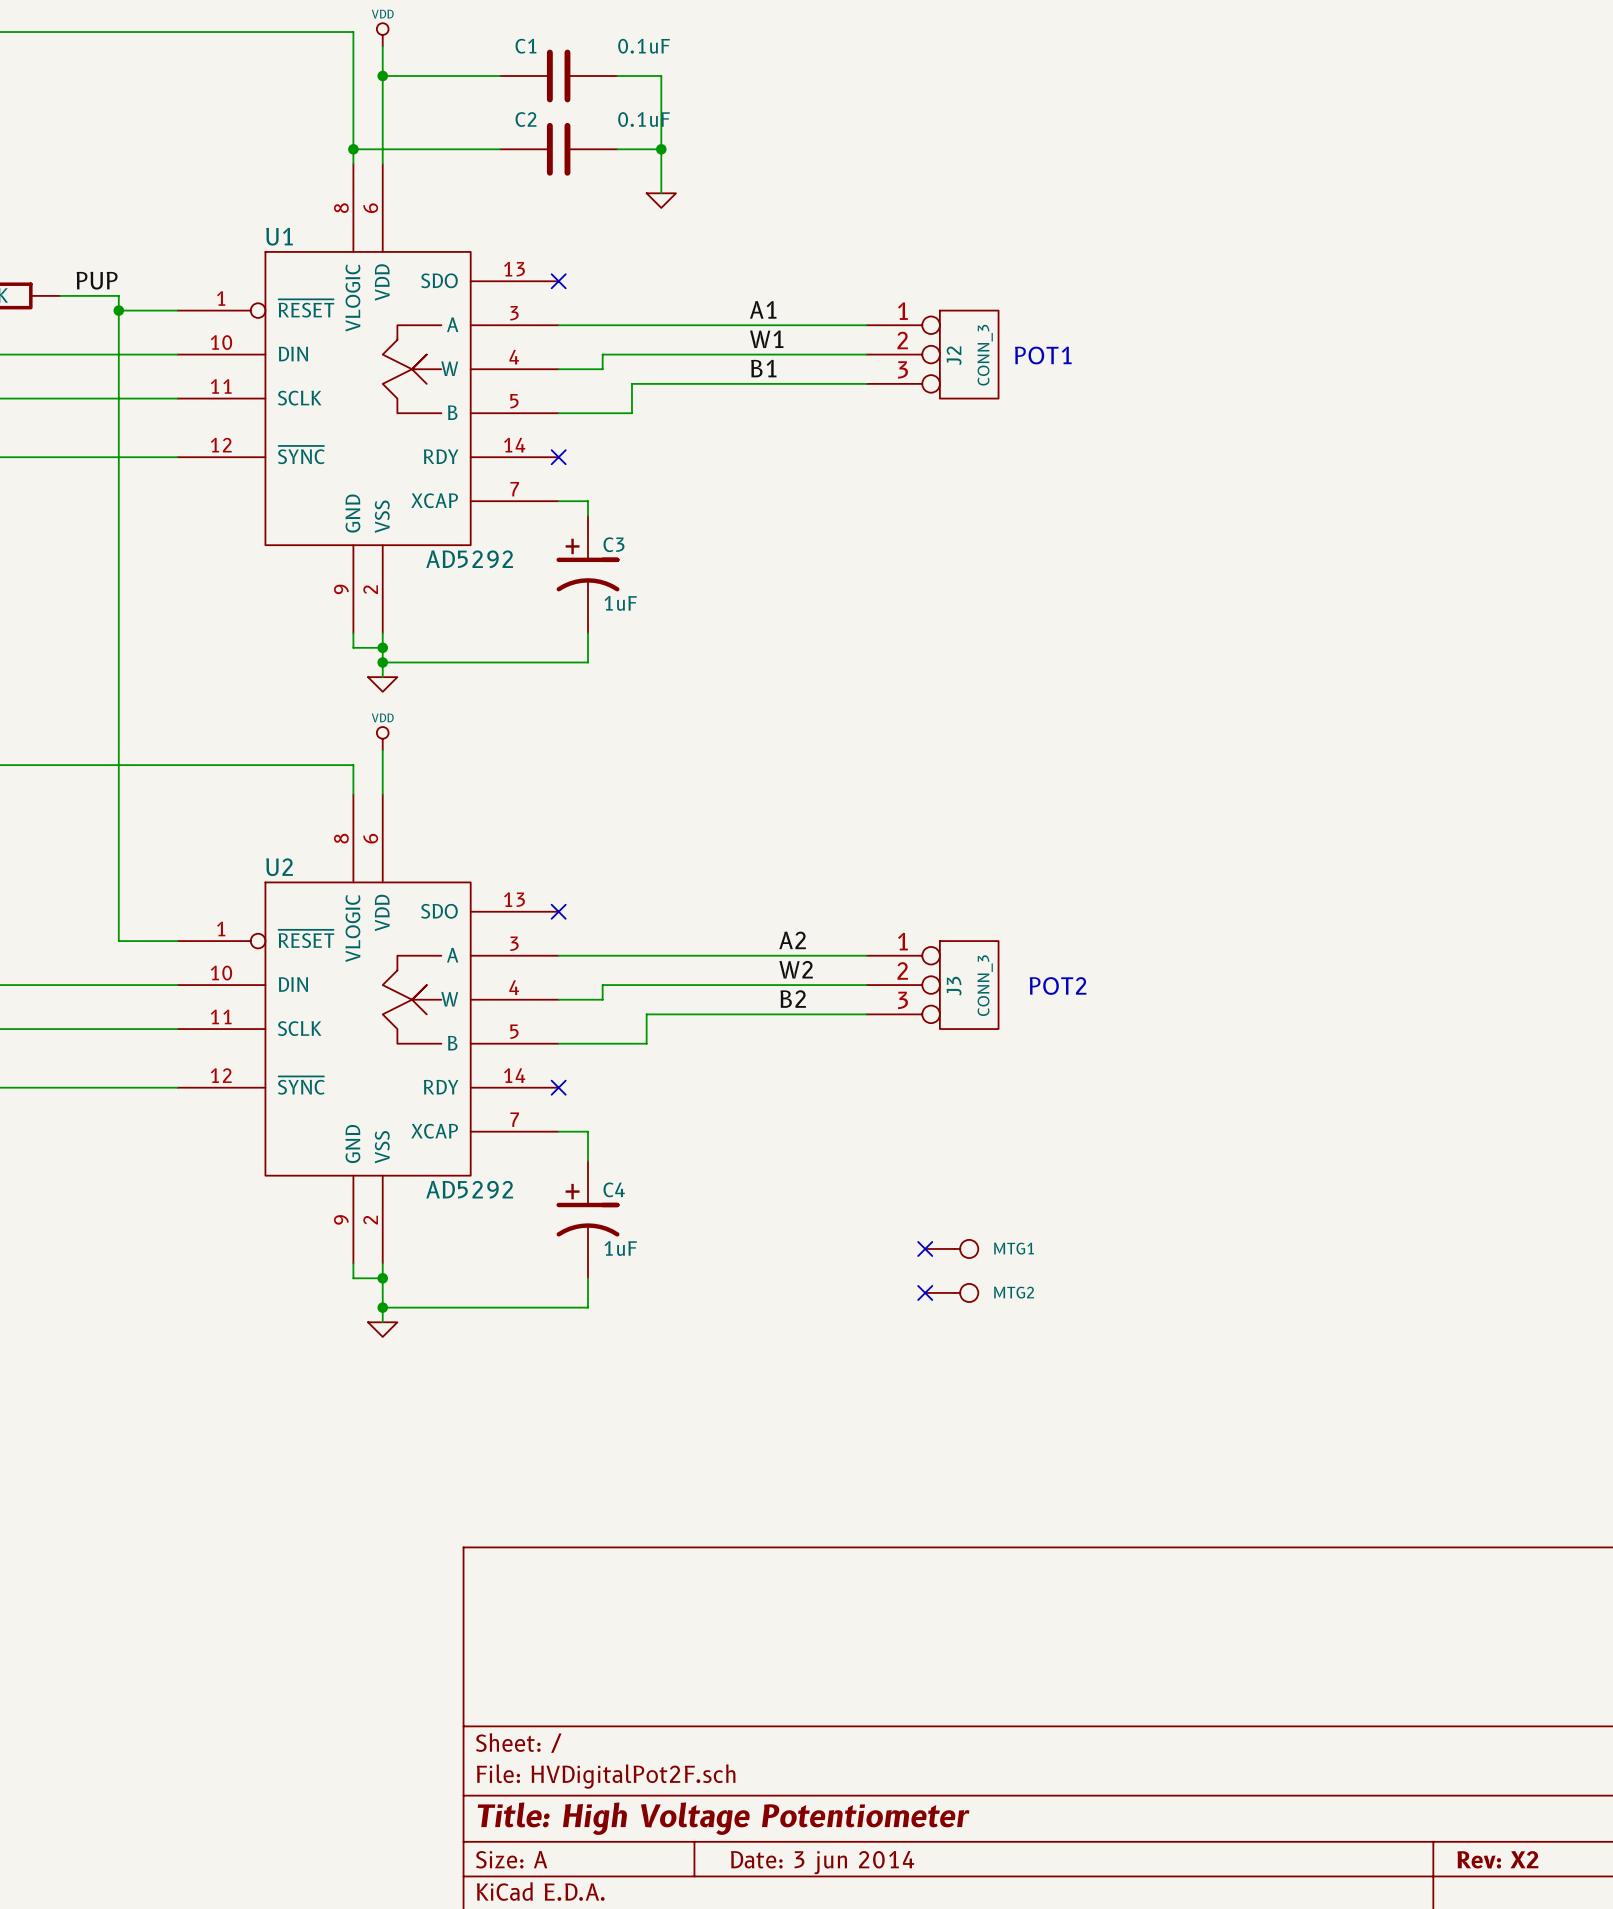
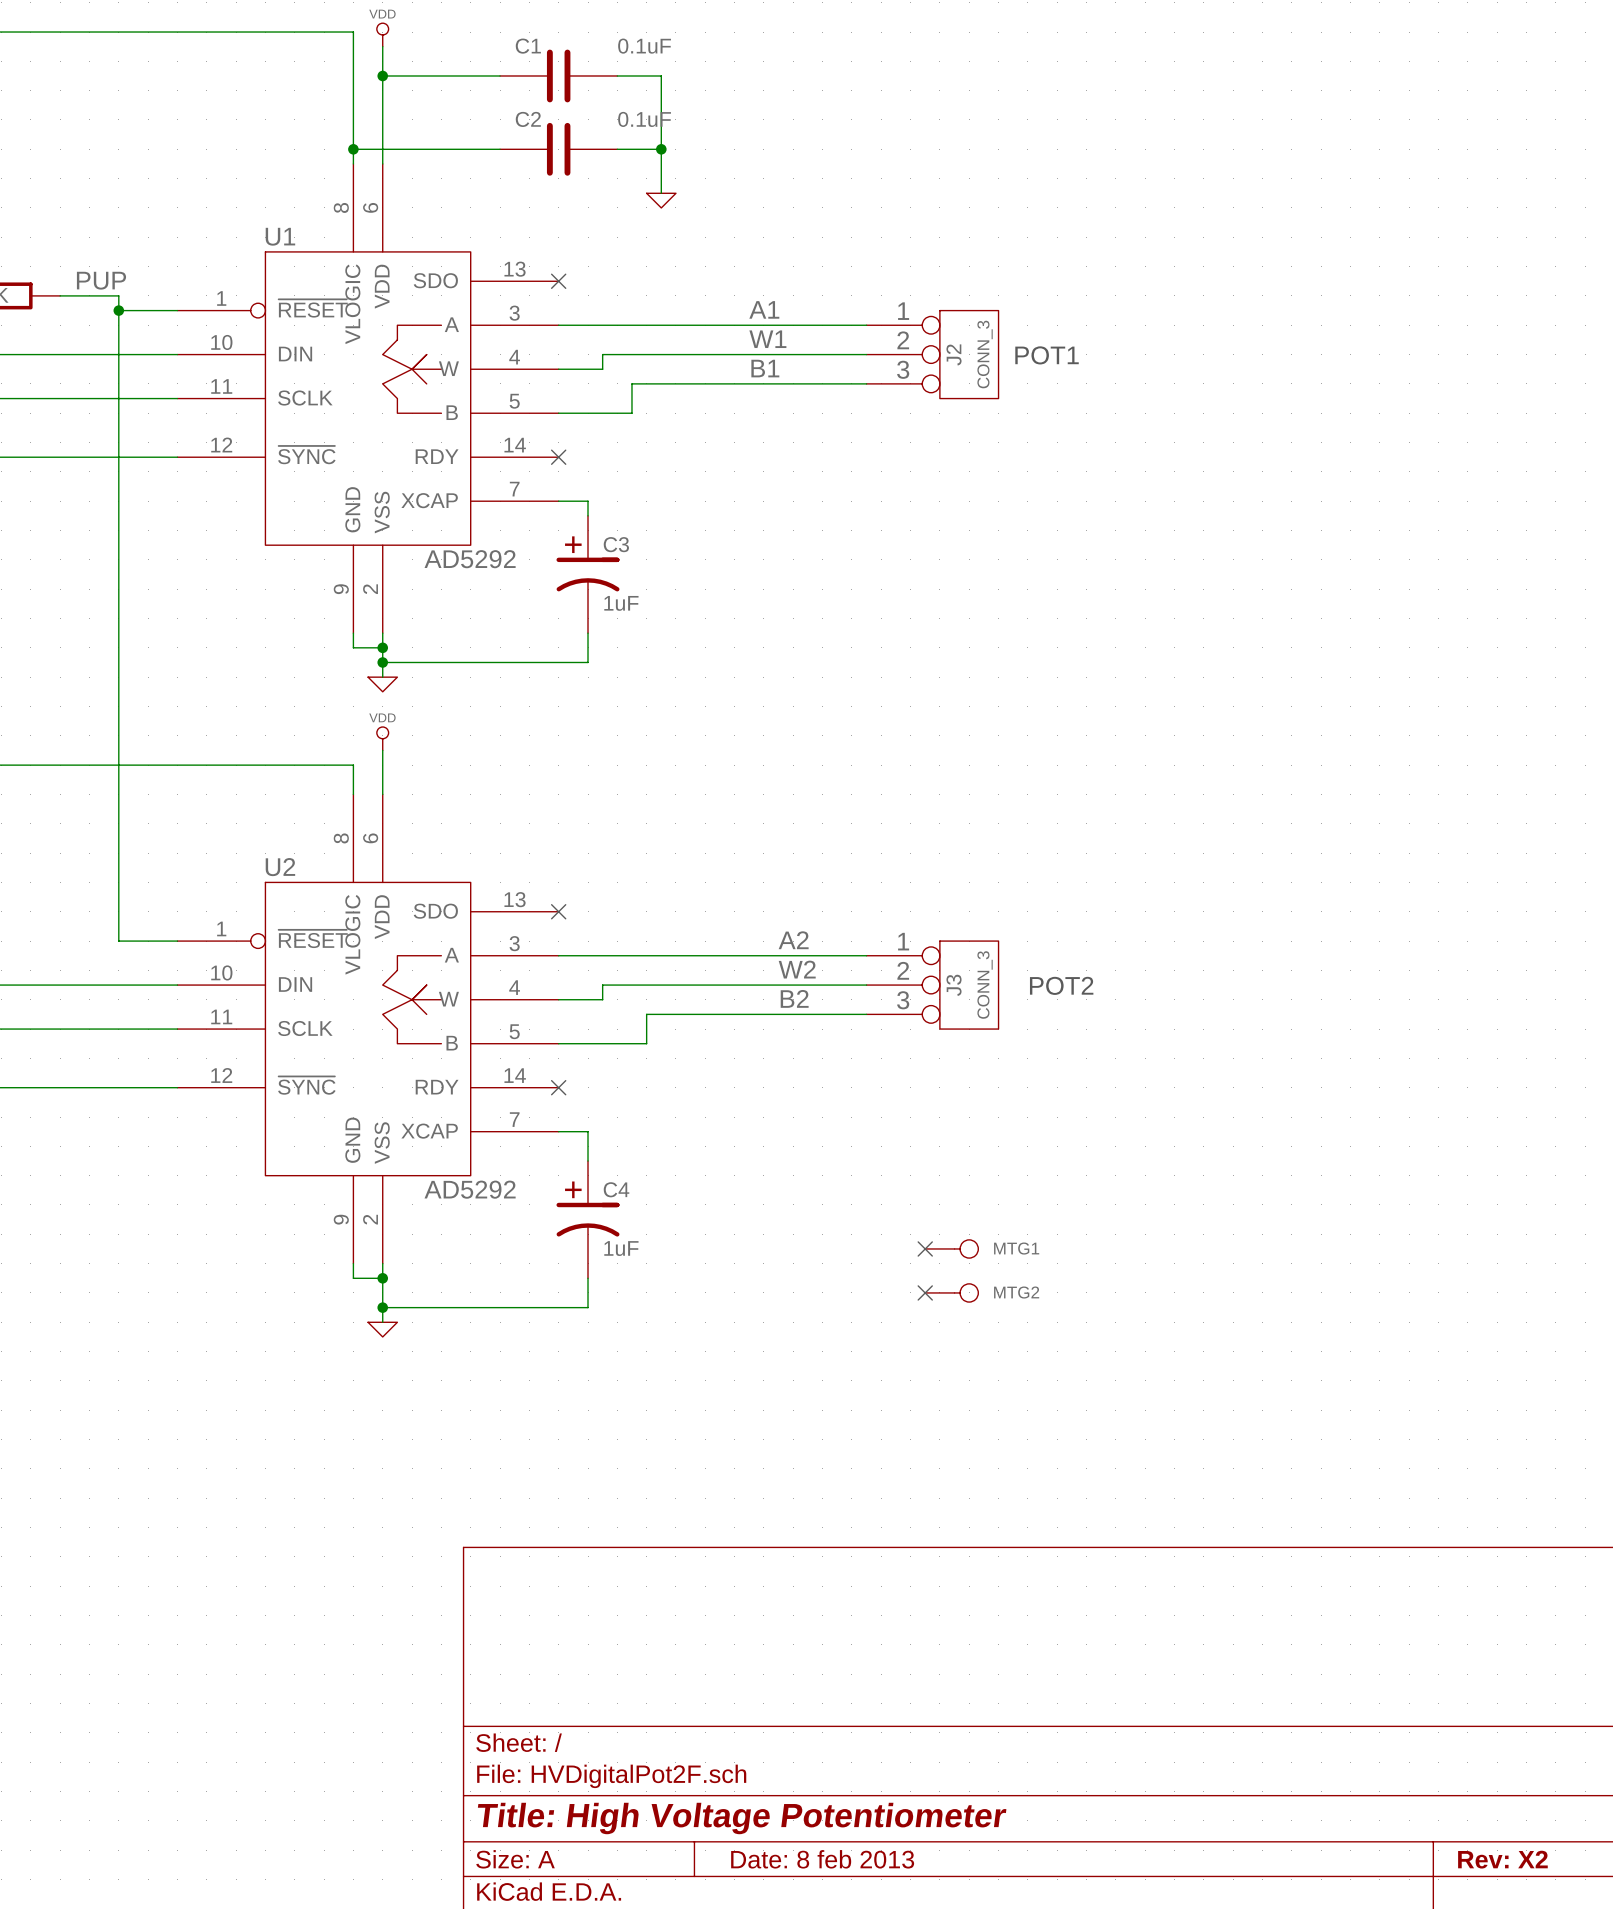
title block: Date: 3 jun 2014 (822, 1862) -> Date: 8 feb 2013 (822, 1859)

